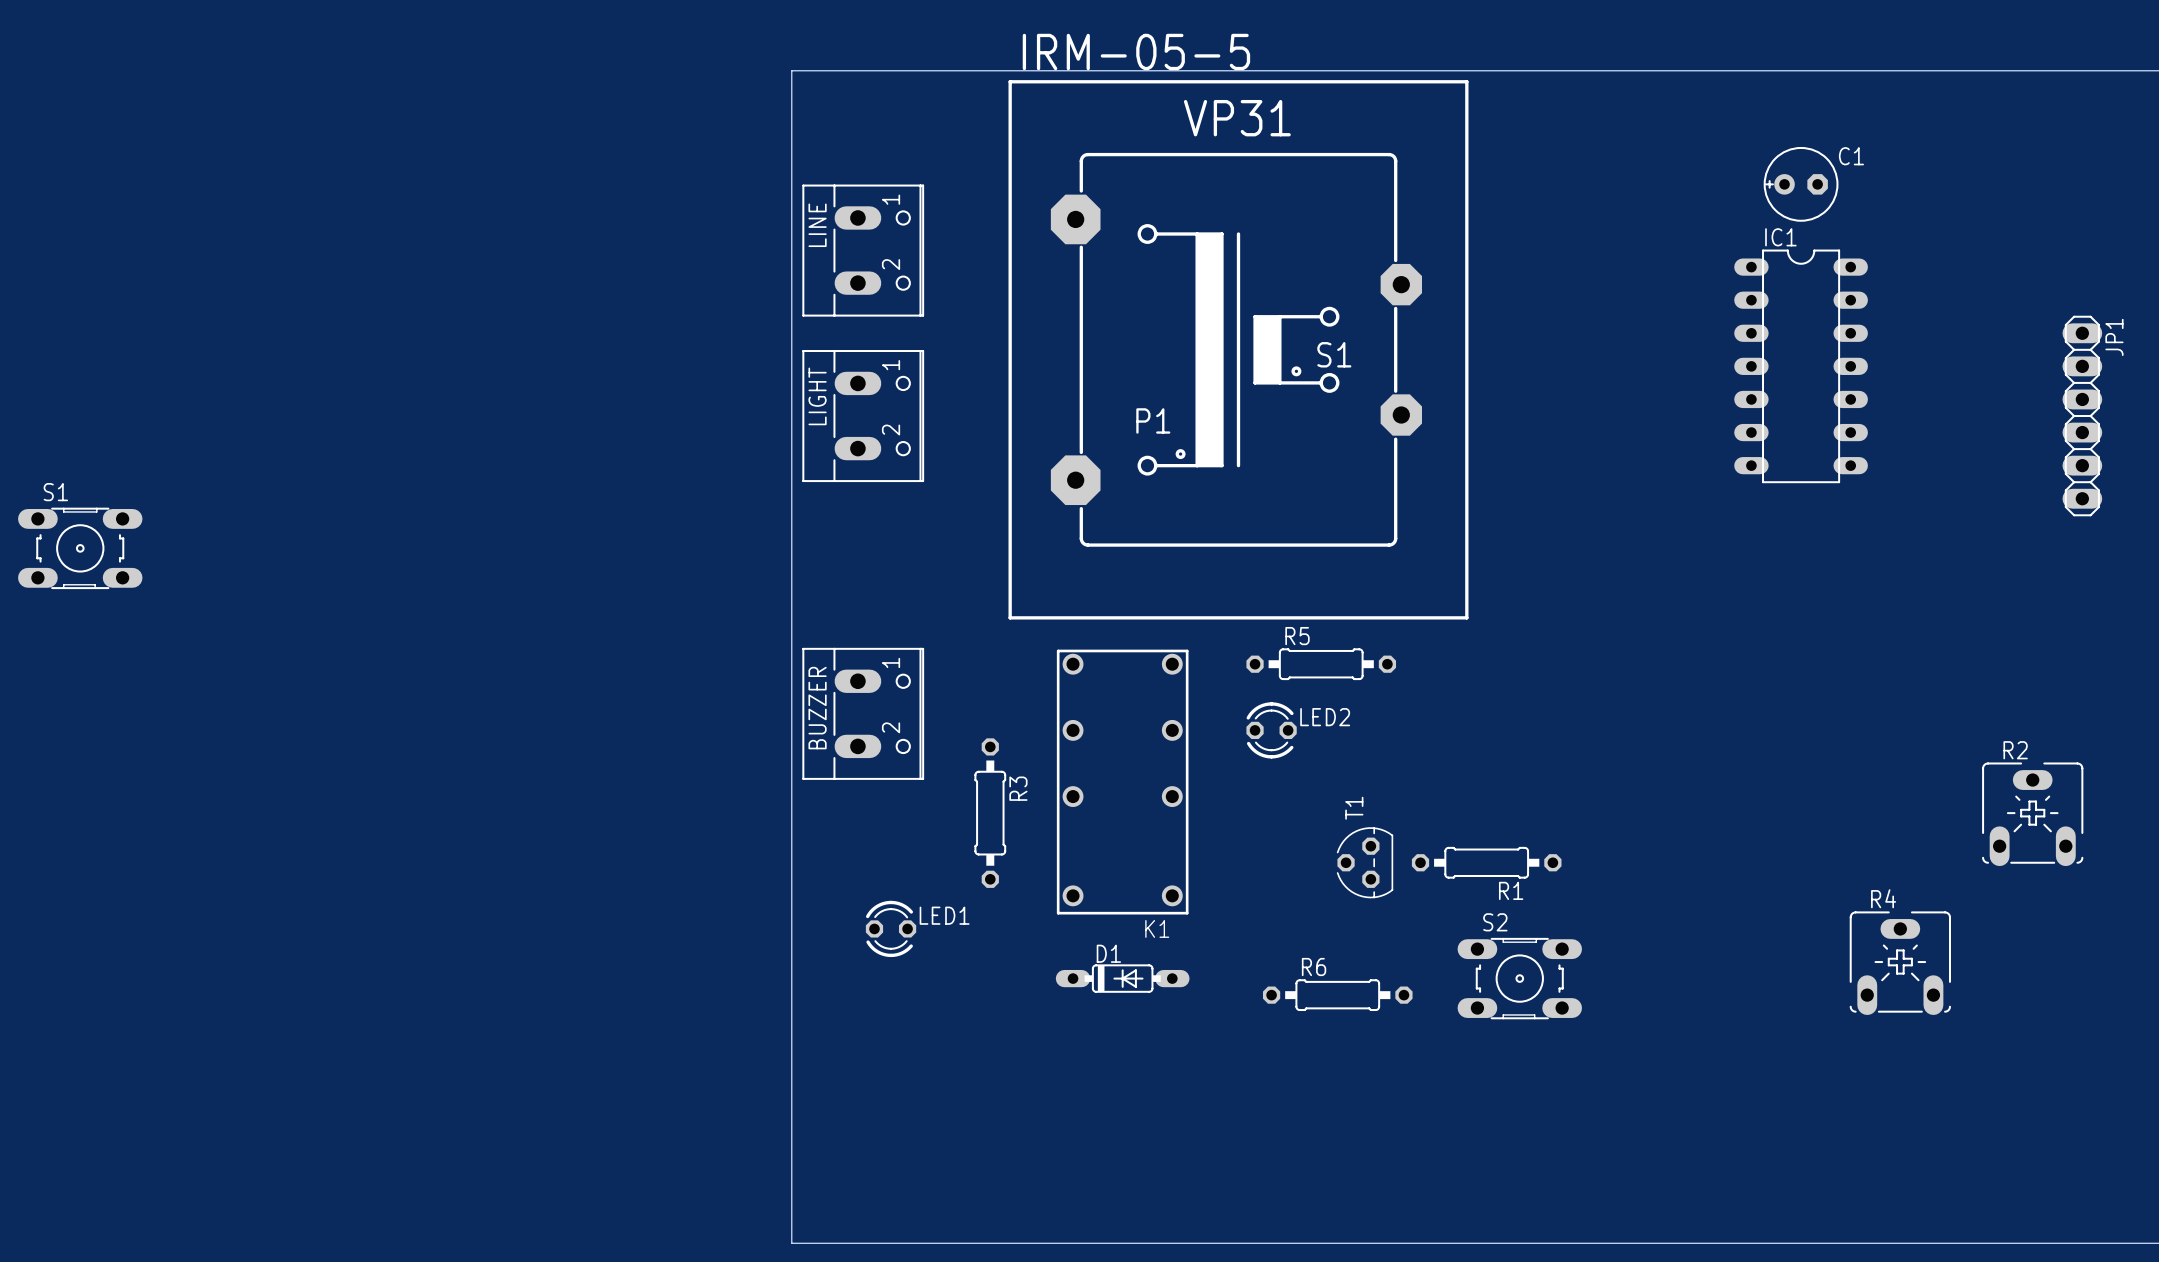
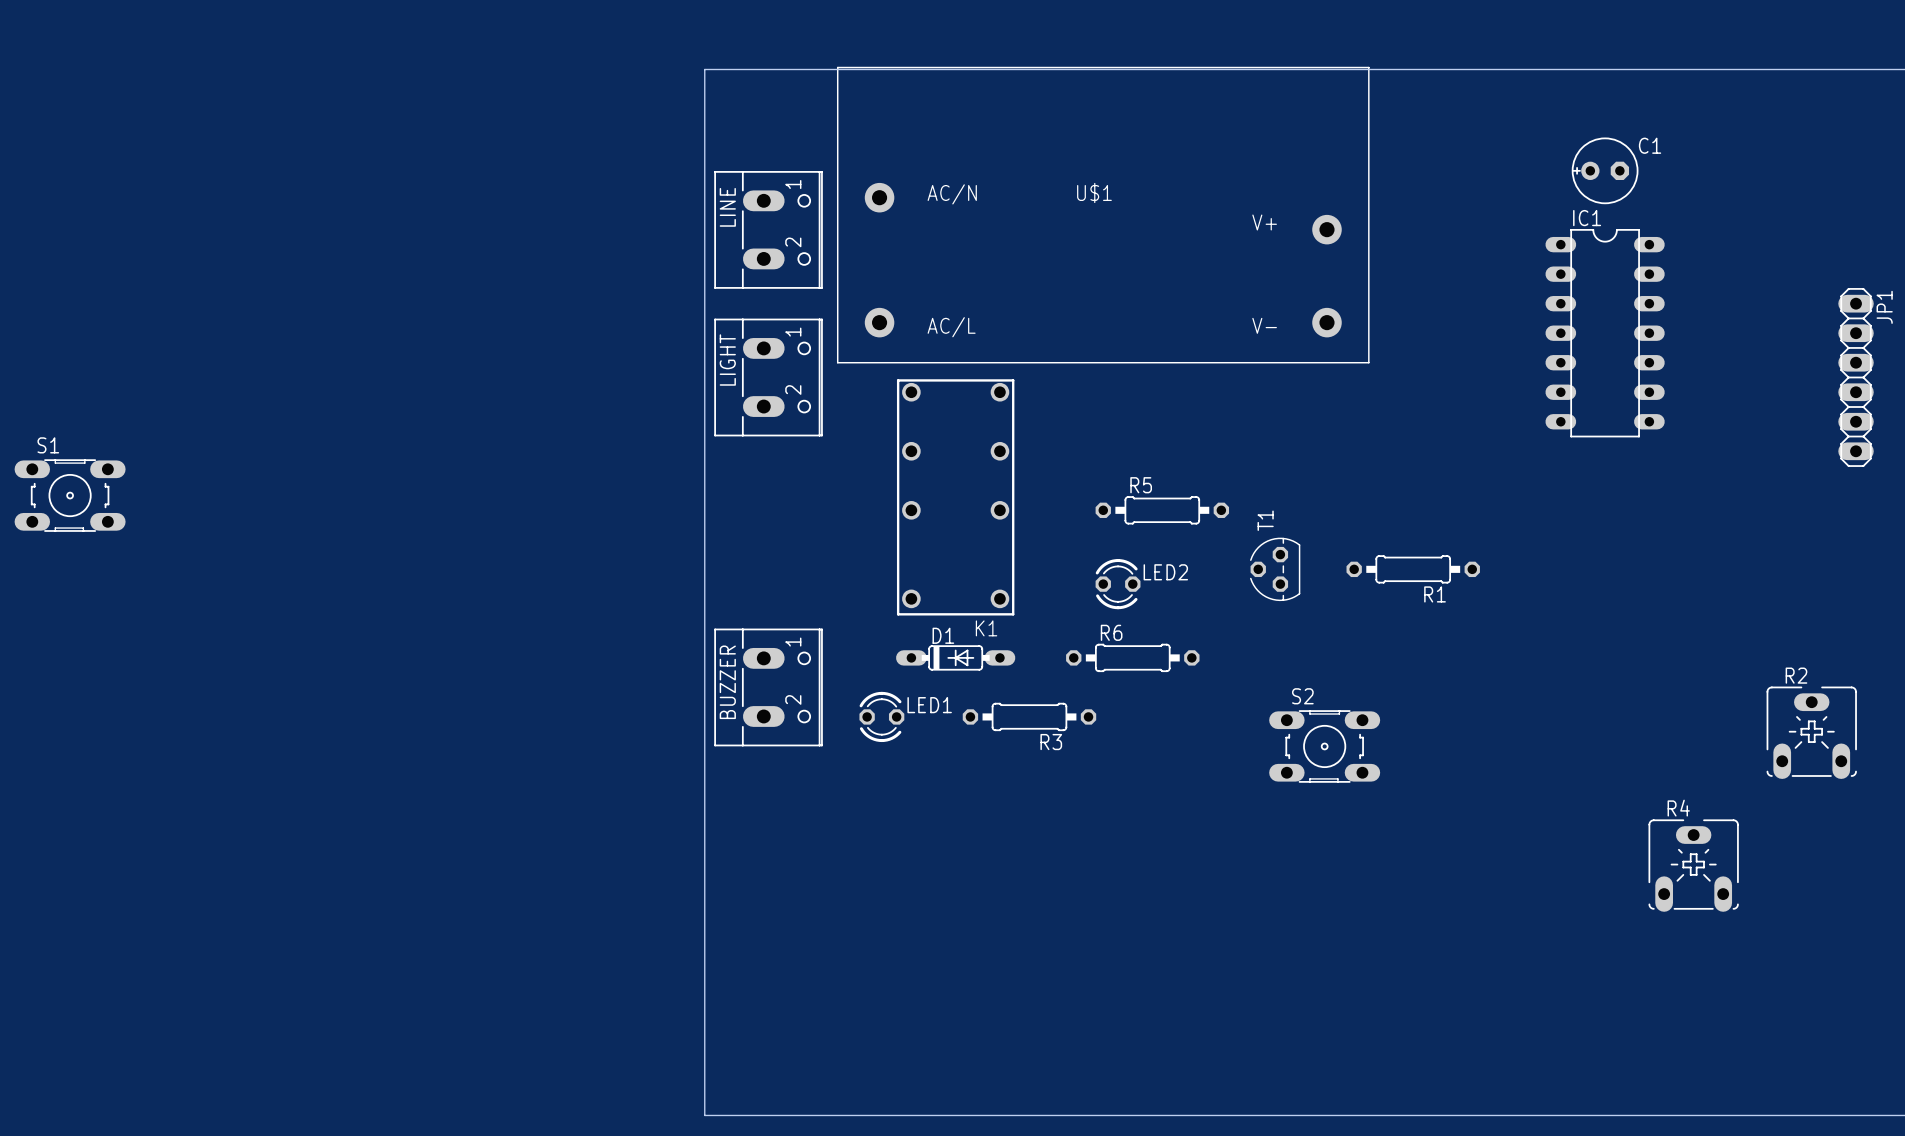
U$1: none -> (1103, 215)
IRM-05-5: (1238, 349) -> none
R5 position: (1321, 664) -> (1162, 510)
BUZZER position: (863, 713) -> (768, 687)
LED2 position: (1271, 730) -> (1118, 584)
K1 position: (1122, 782) -> (955, 497)
R3 rotation: 0° (990, 813) -> 90° clockwise (1029, 716)
R3 position: (990, 813) -> (1029, 716)
T1 position: (1365, 862) -> (1275, 569)
R1 position: (1486, 862) -> (1413, 569)
LED1 position: (891, 928) -> (881, 716)
D1 position: (1122, 978) -> (955, 657)
S2 position: (1519, 978) -> (1324, 746)
R6 position: (1337, 995) -> (1132, 657)

